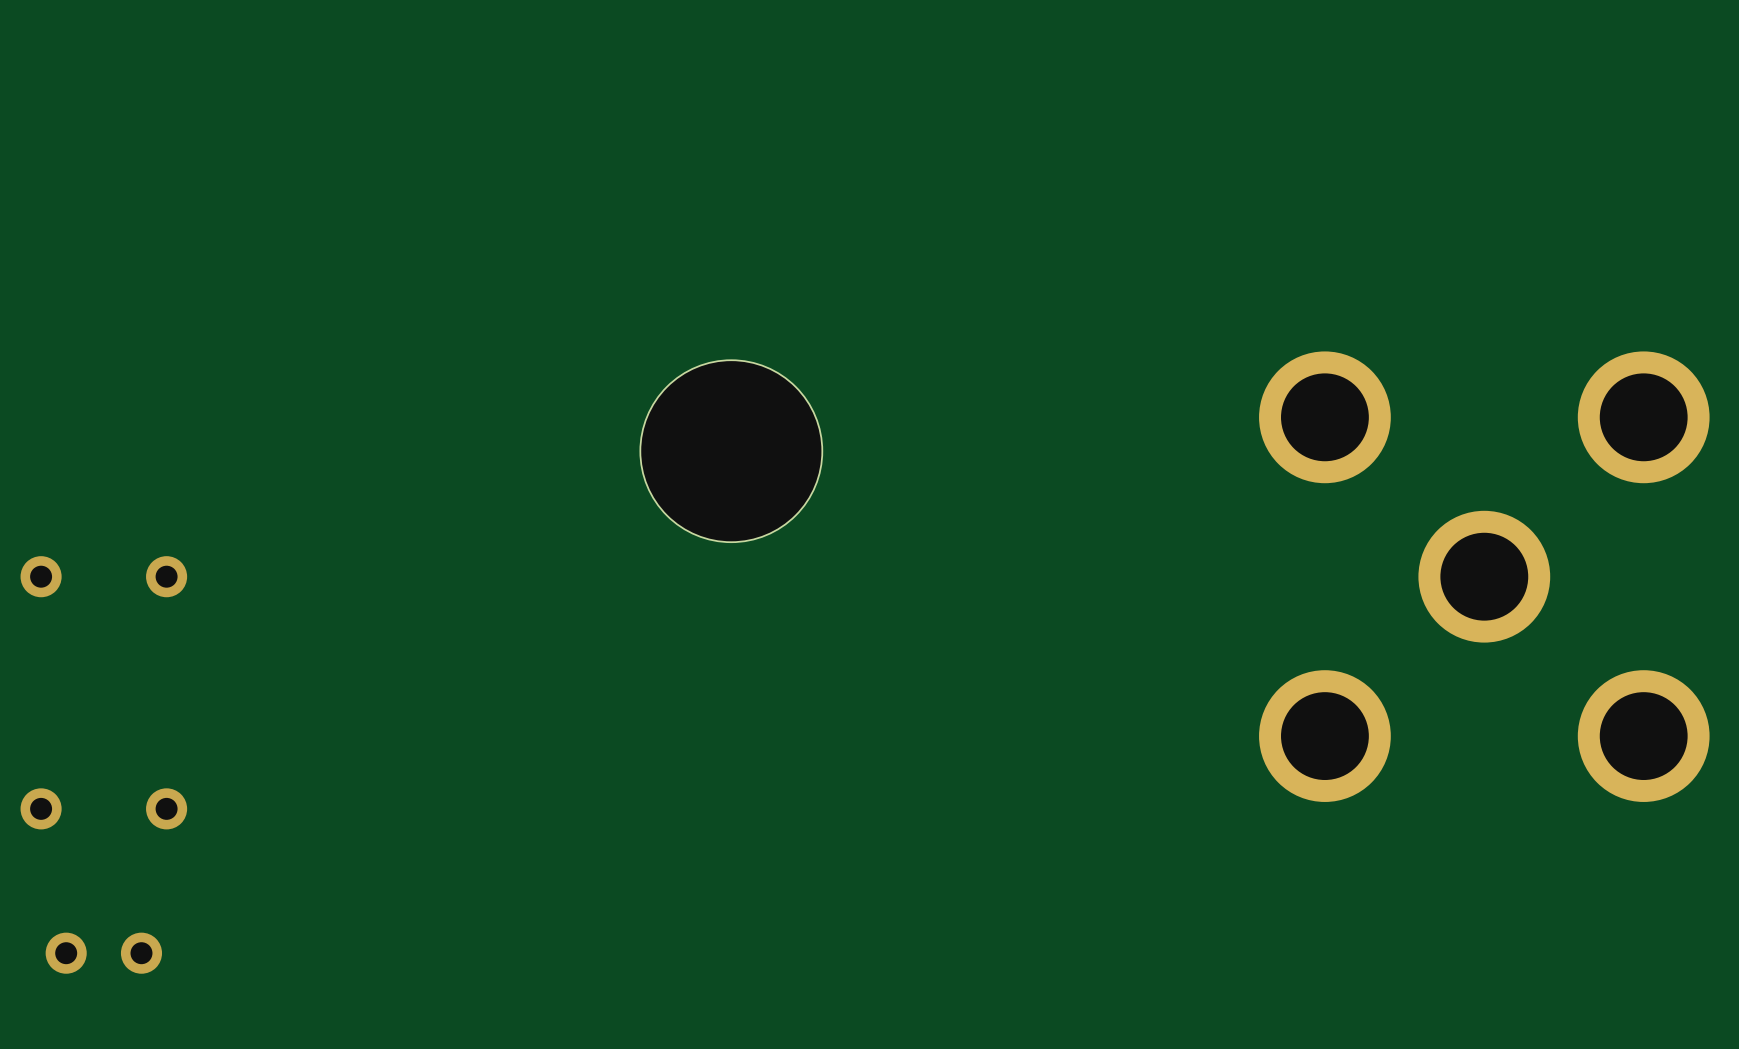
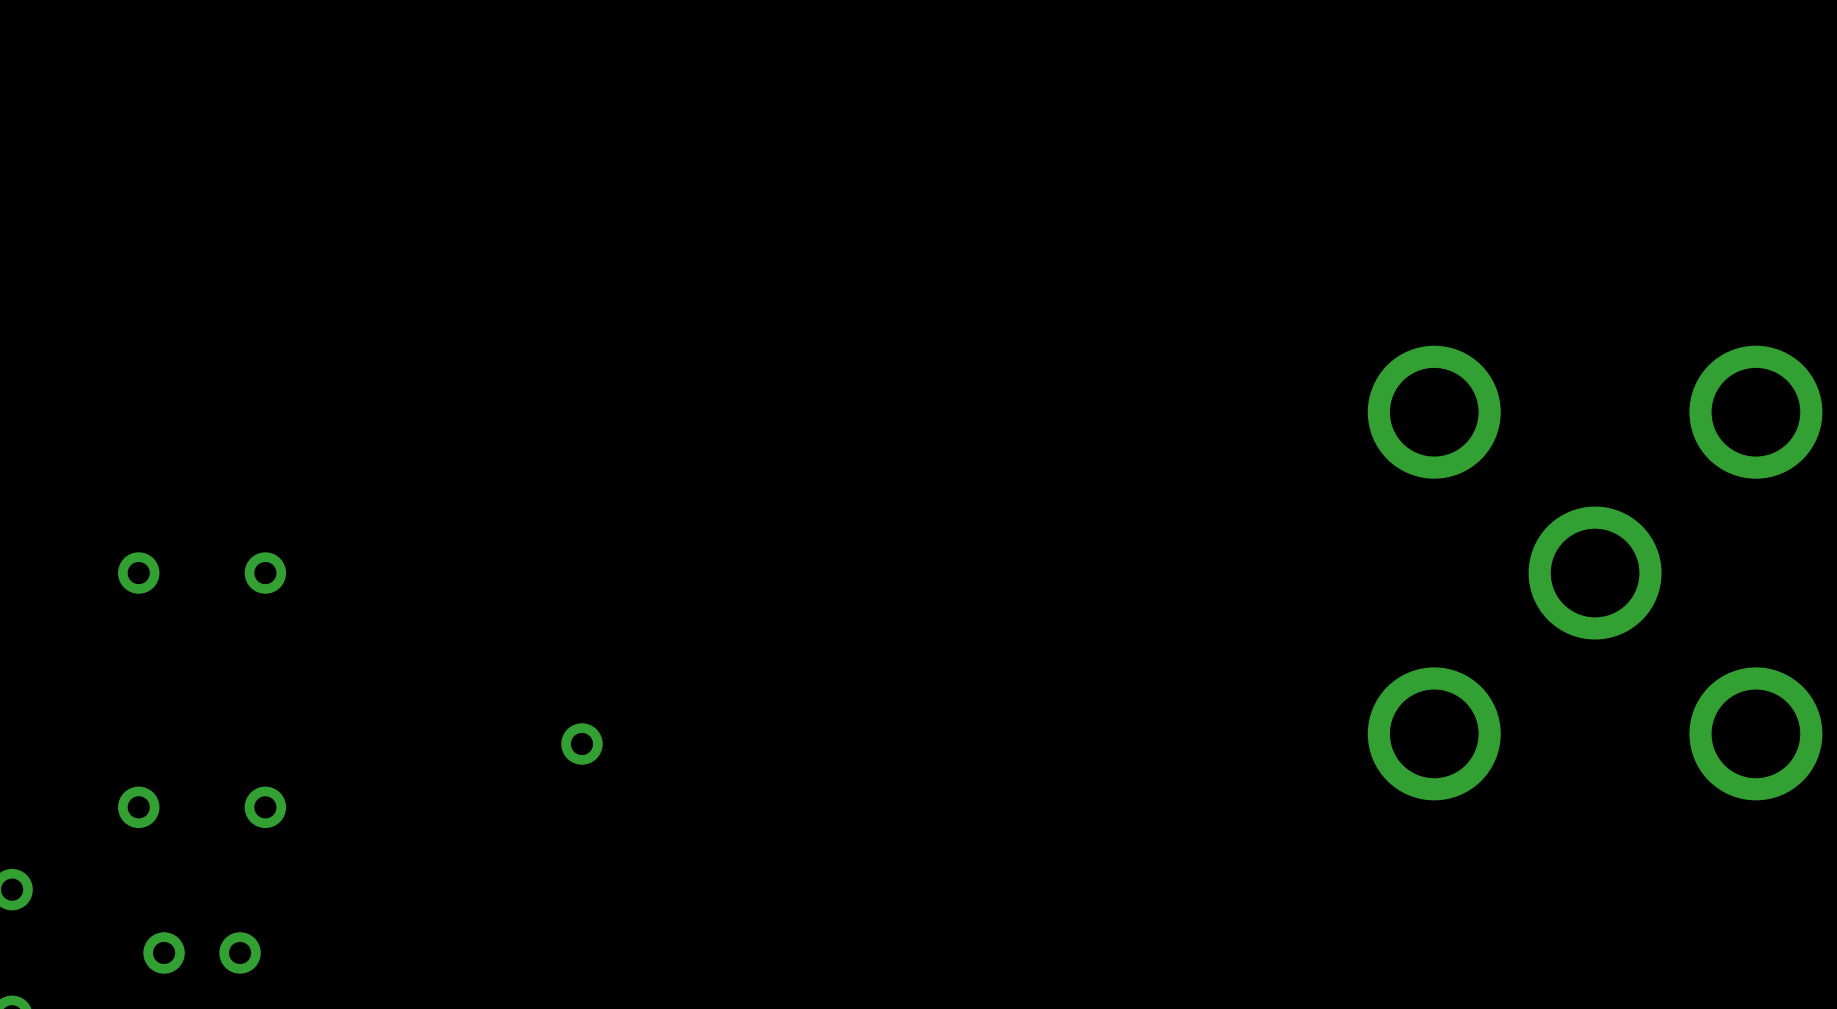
hole: (731, 451) -> none
via: none -> (581, 744)

